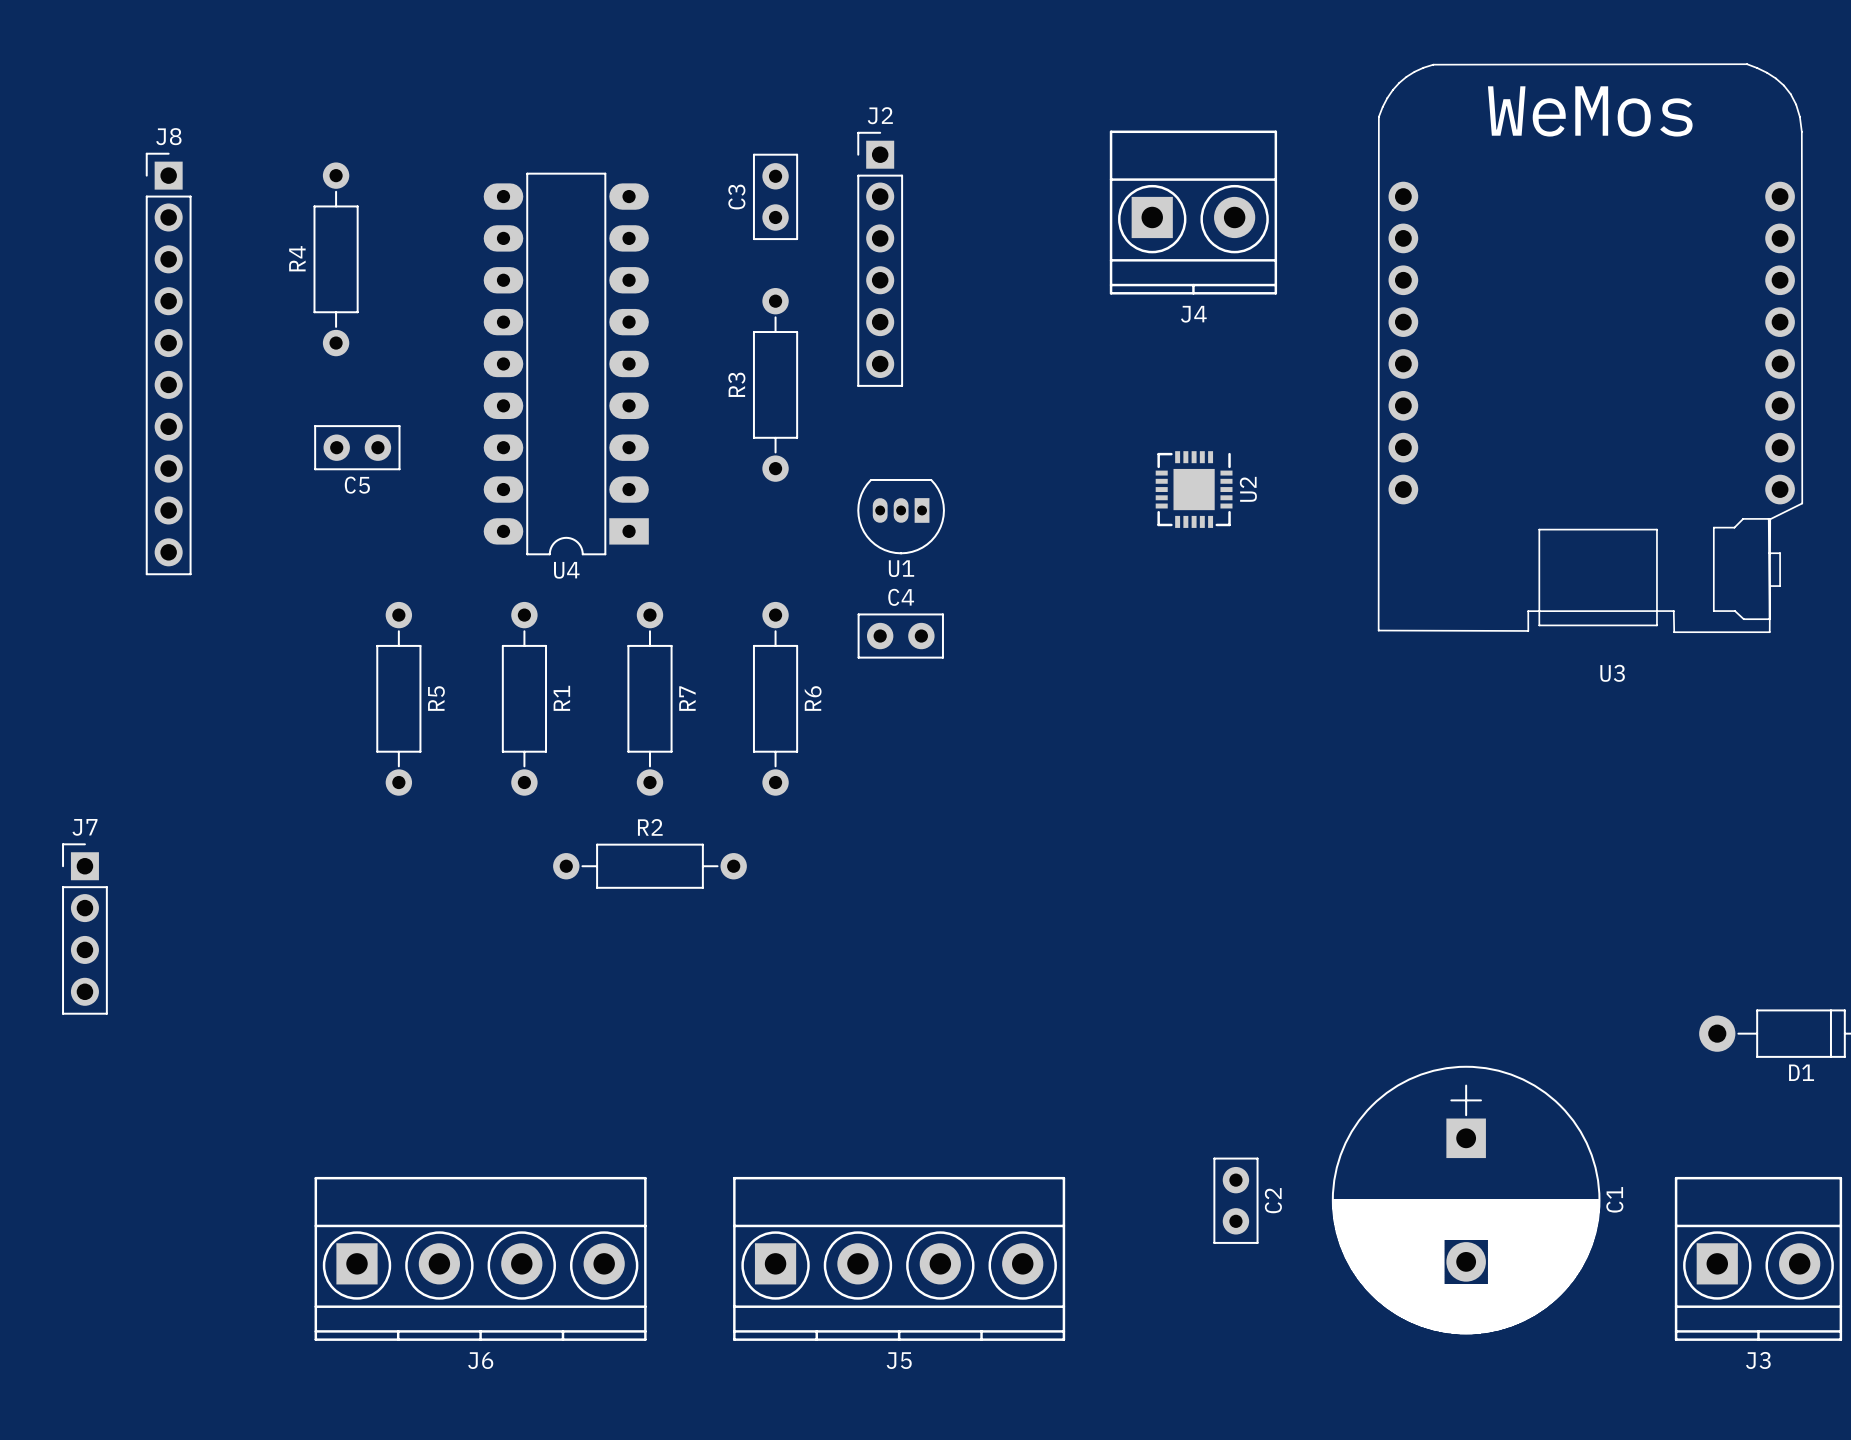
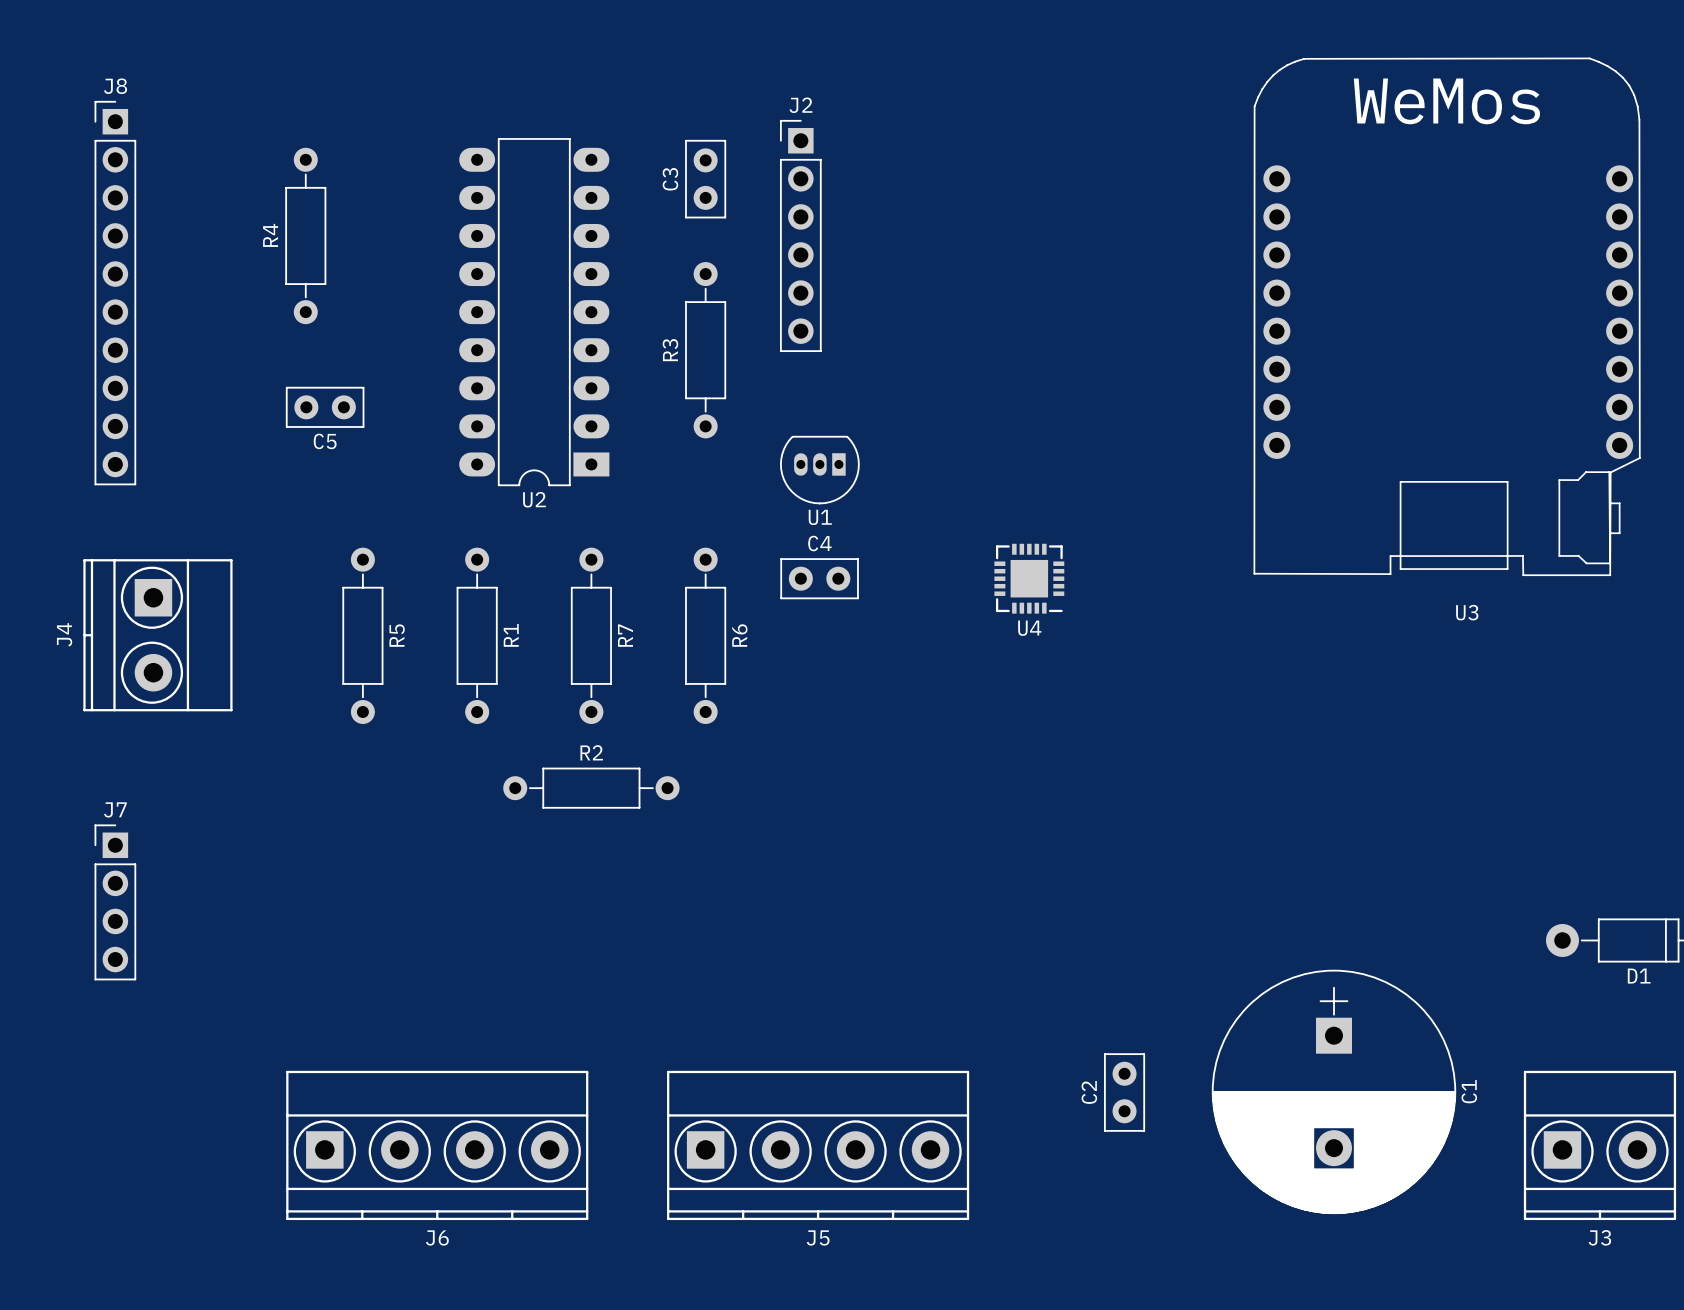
U4 footprint: [483, 172, 649, 556] -> [994, 543, 1065, 614]
J4 rotation: 0° (1193, 212) -> 90° clockwise (157, 635)
J4 position: (1193, 212) -> (157, 635)
J8 position: (168, 363) -> (115, 293)
U2 footprint: [1155, 451, 1233, 528] -> [459, 138, 610, 487]
U2 name position: U2 (1248, 489) -> U2 (534, 499)
U4 name position: U4 (566, 570) -> U4 (1029, 628)
J7 position: (84, 929) -> (115, 902)
C2 name position: C2 (1273, 1200) -> C2 (1089, 1092)

